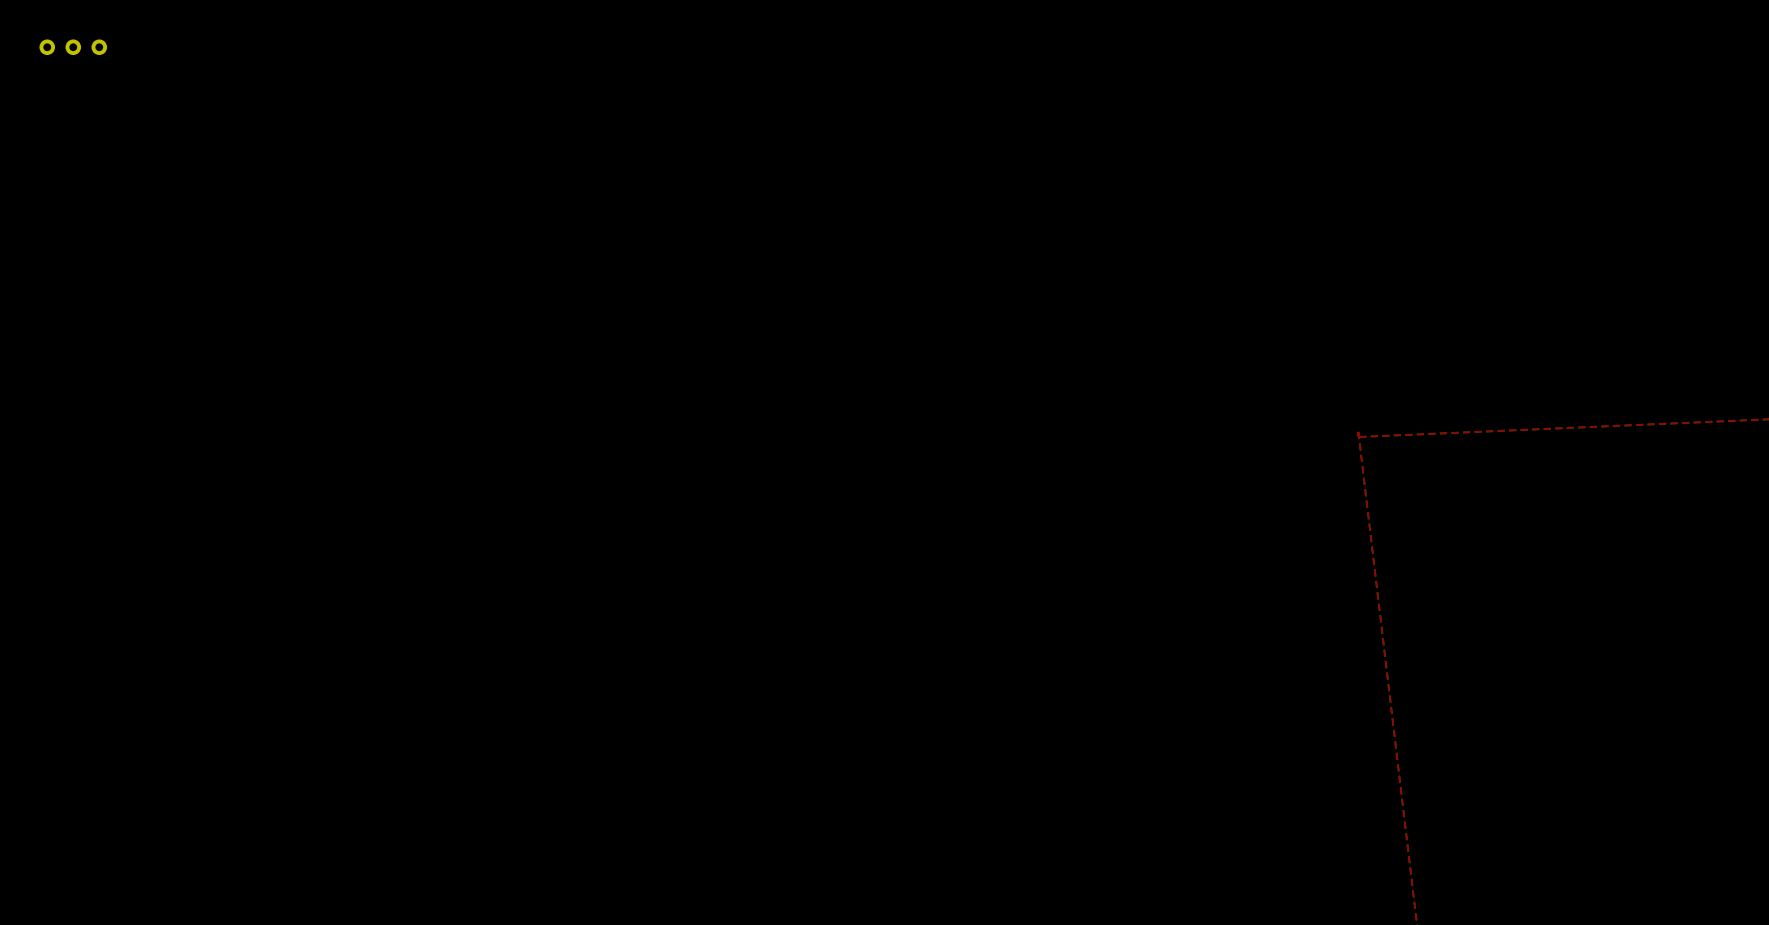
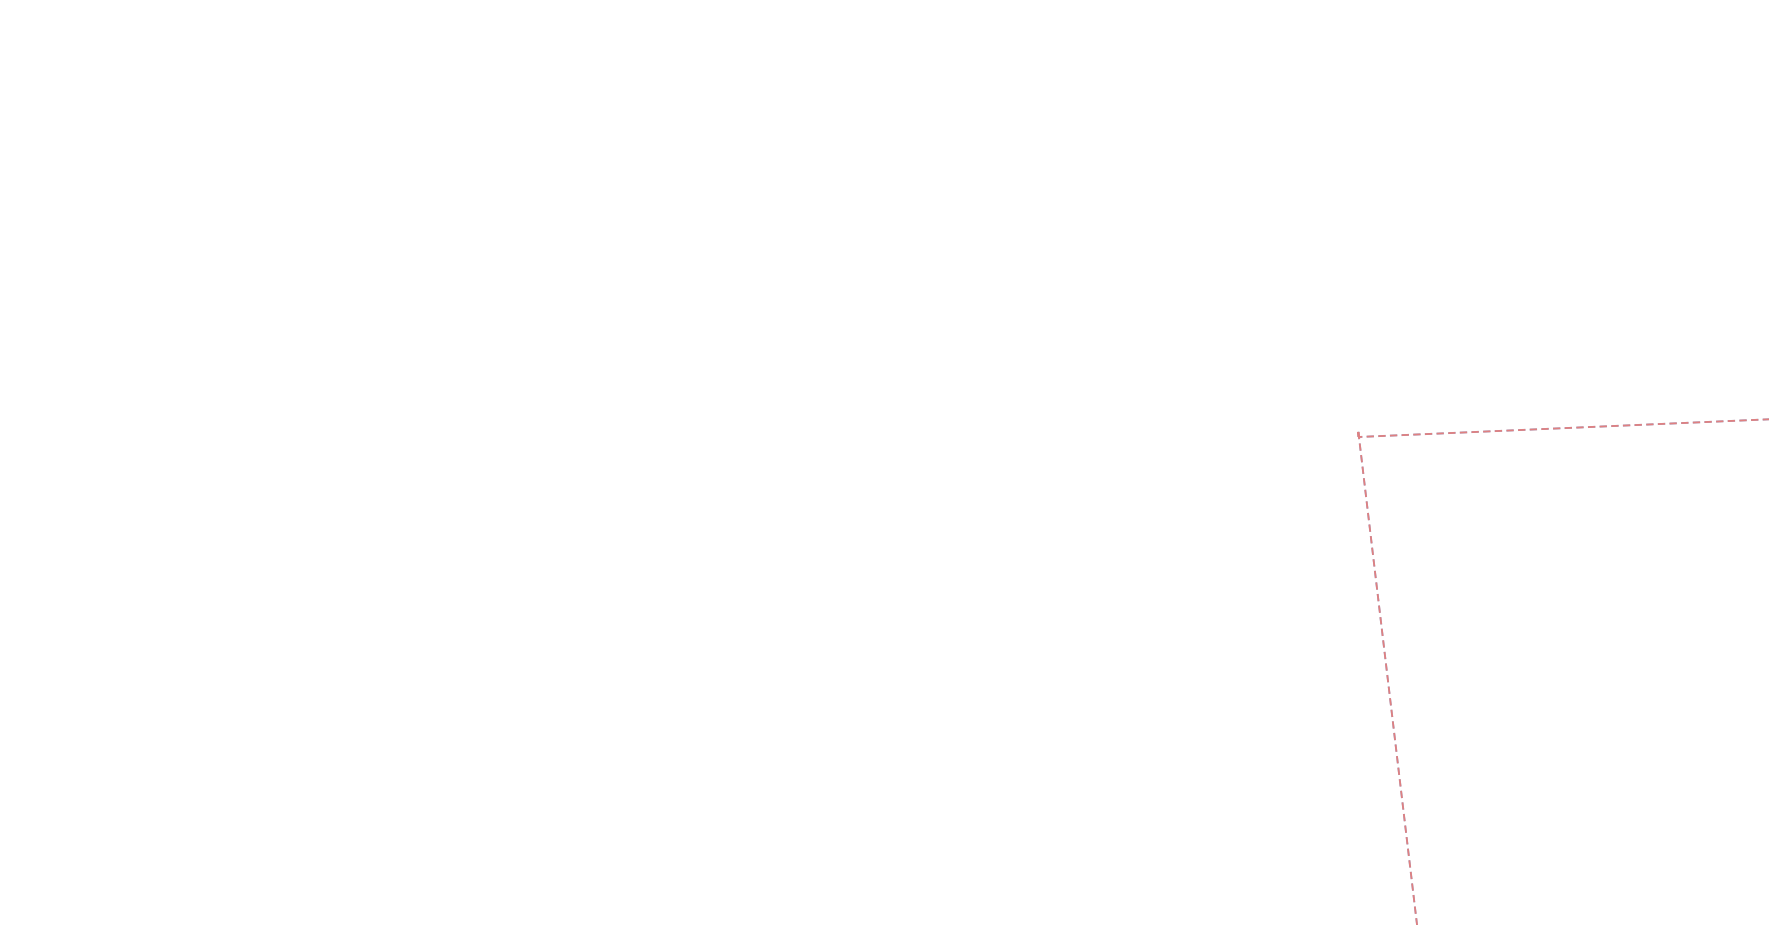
part: (73, 47) -> none

